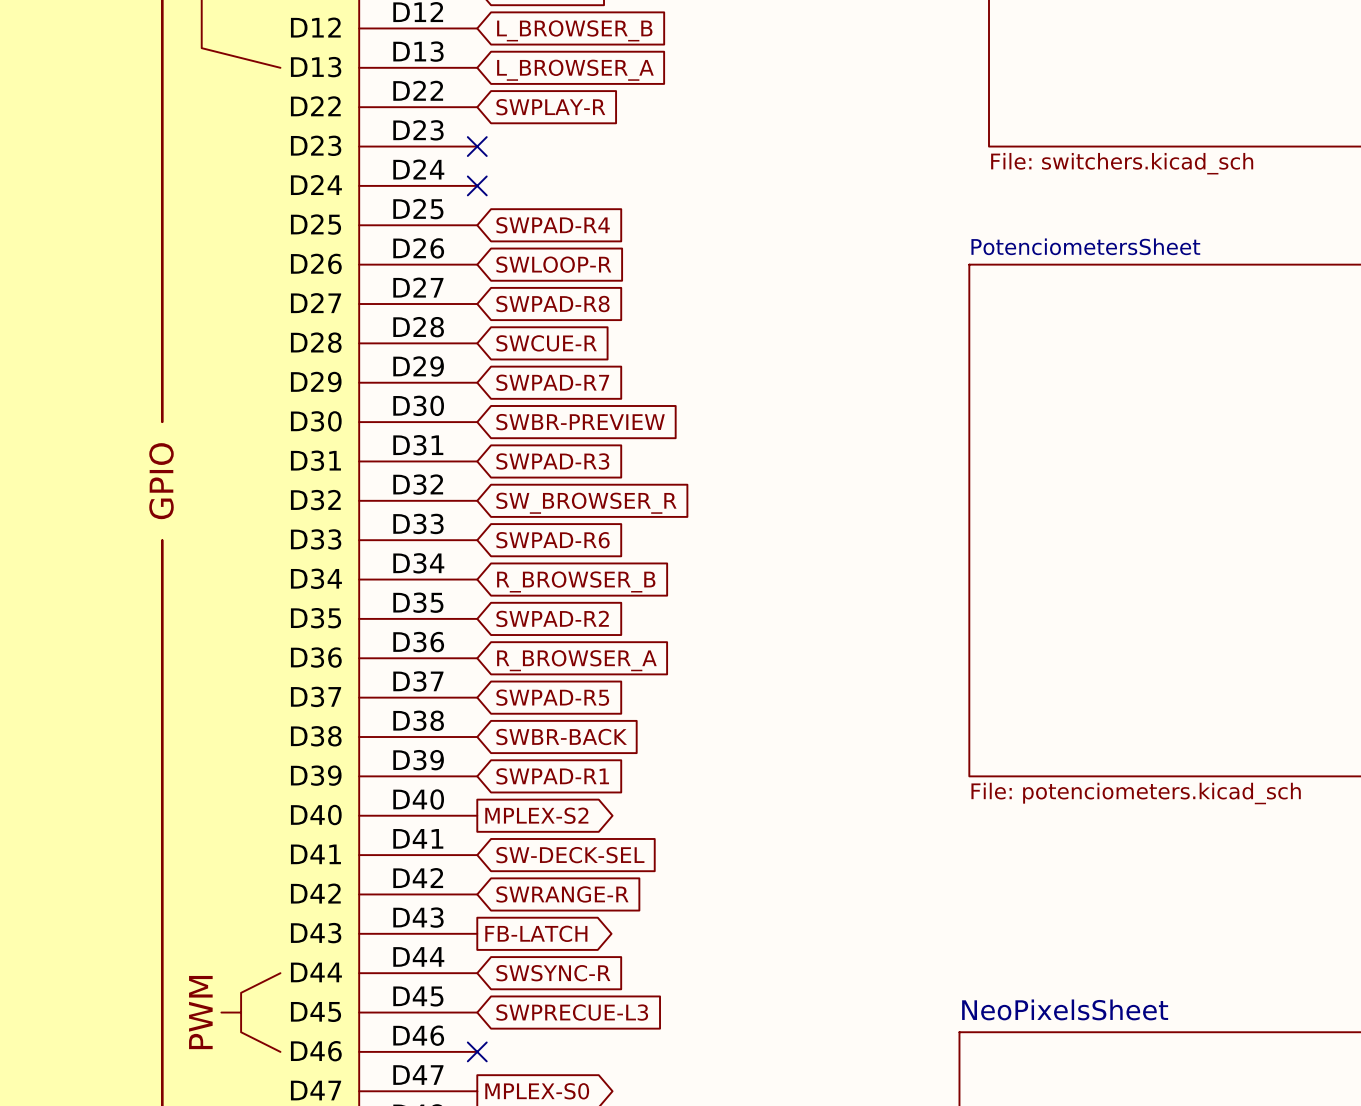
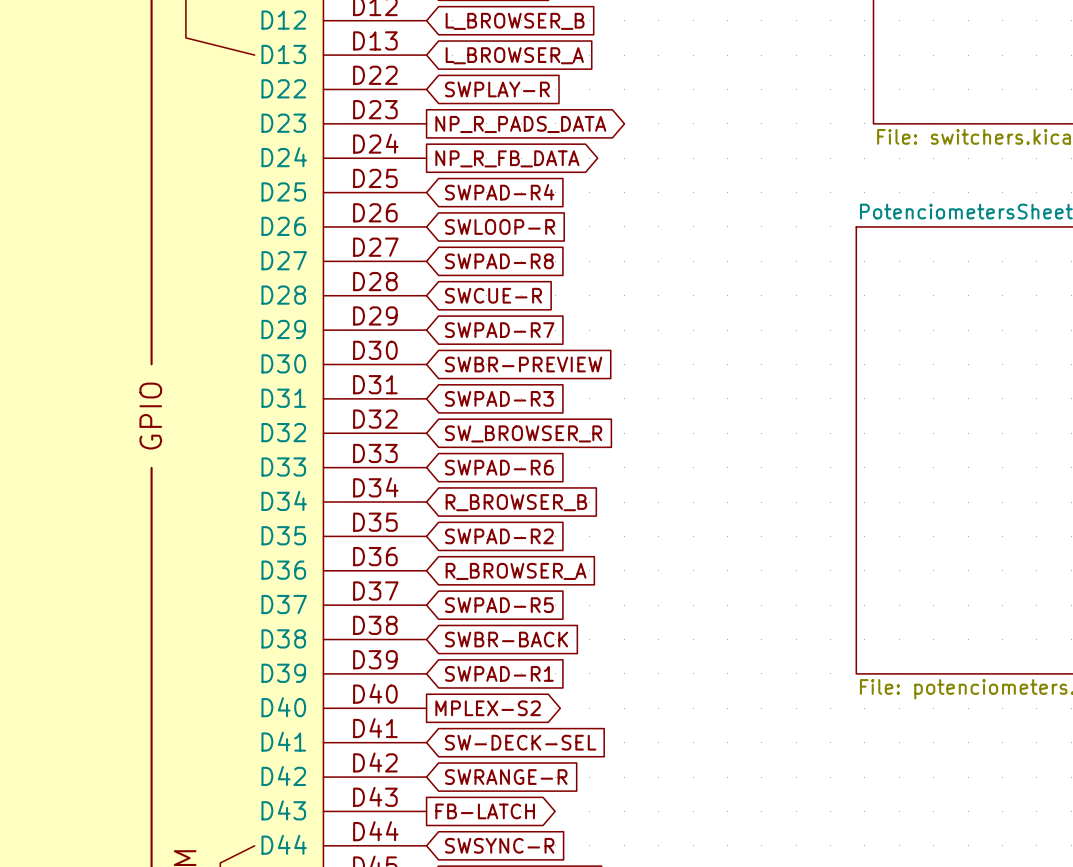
no-connect mark: (477, 146) -> none
global label: none -> NP_R_PADS_DATA (520, 124)
no-connect mark: (477, 185) -> none
global label: none -> NP_R_FB_DATA (507, 158)

